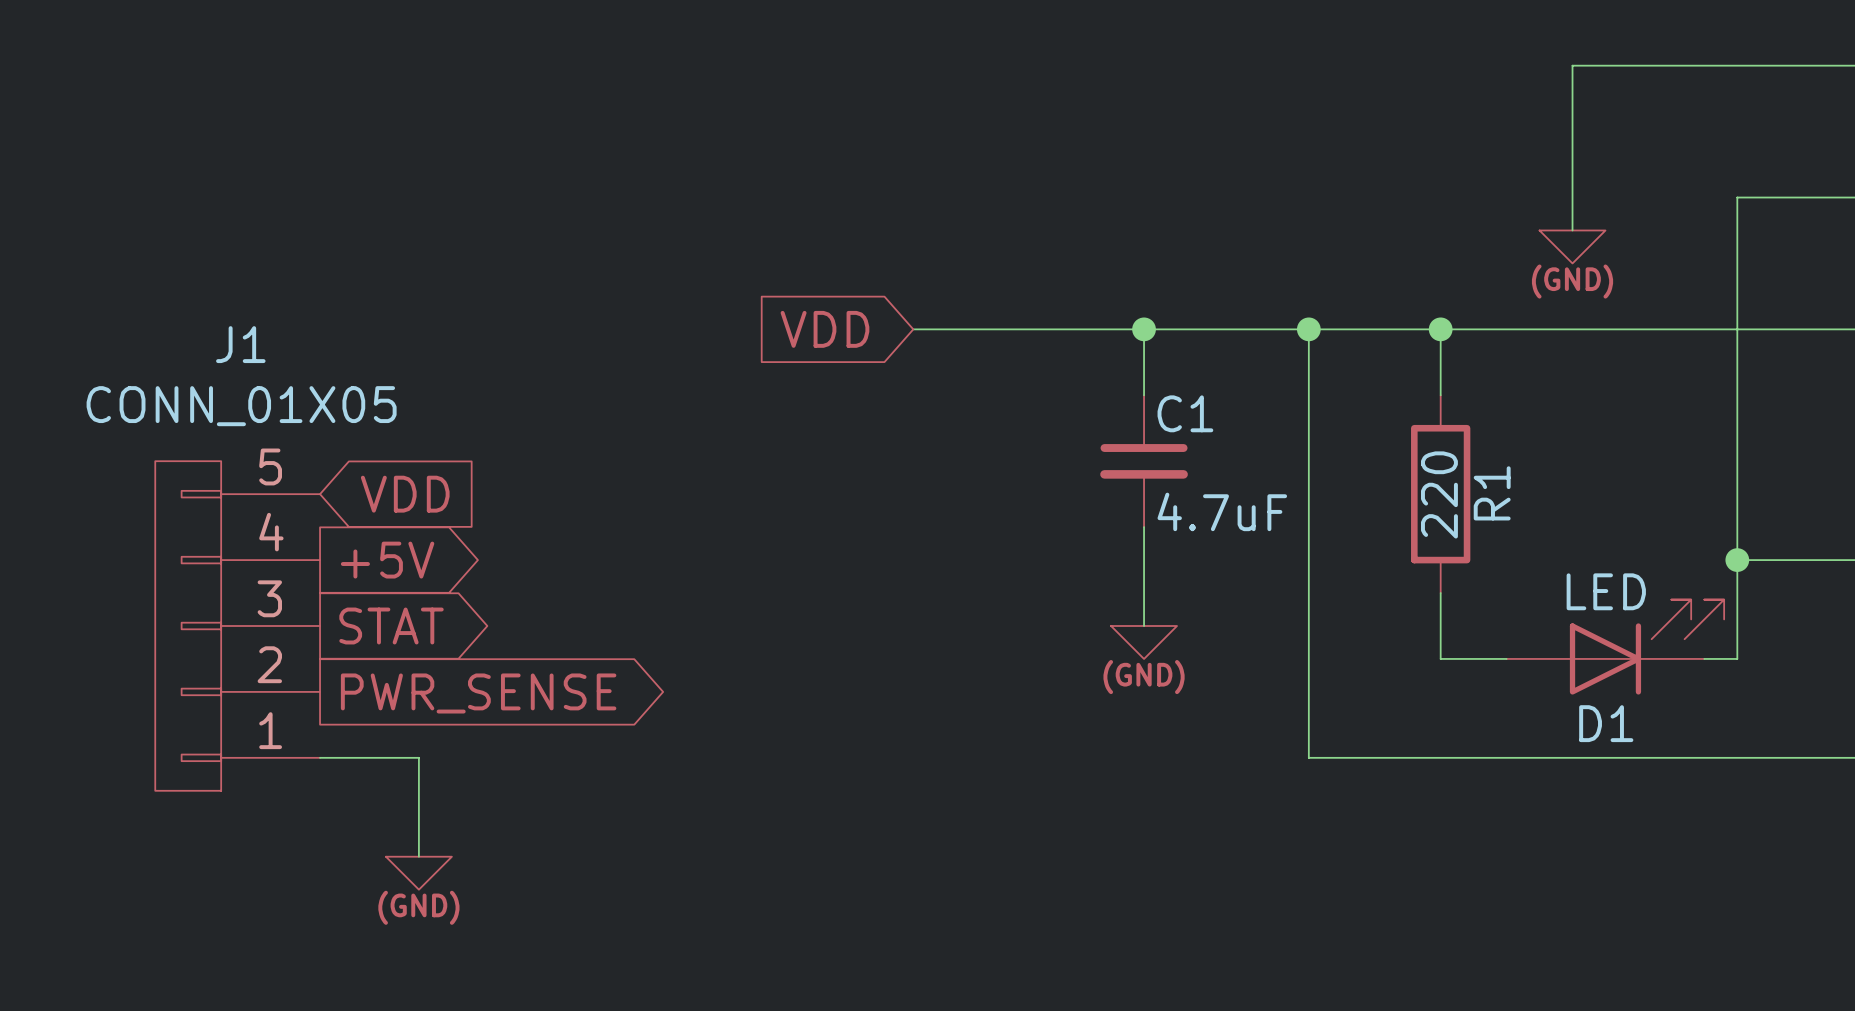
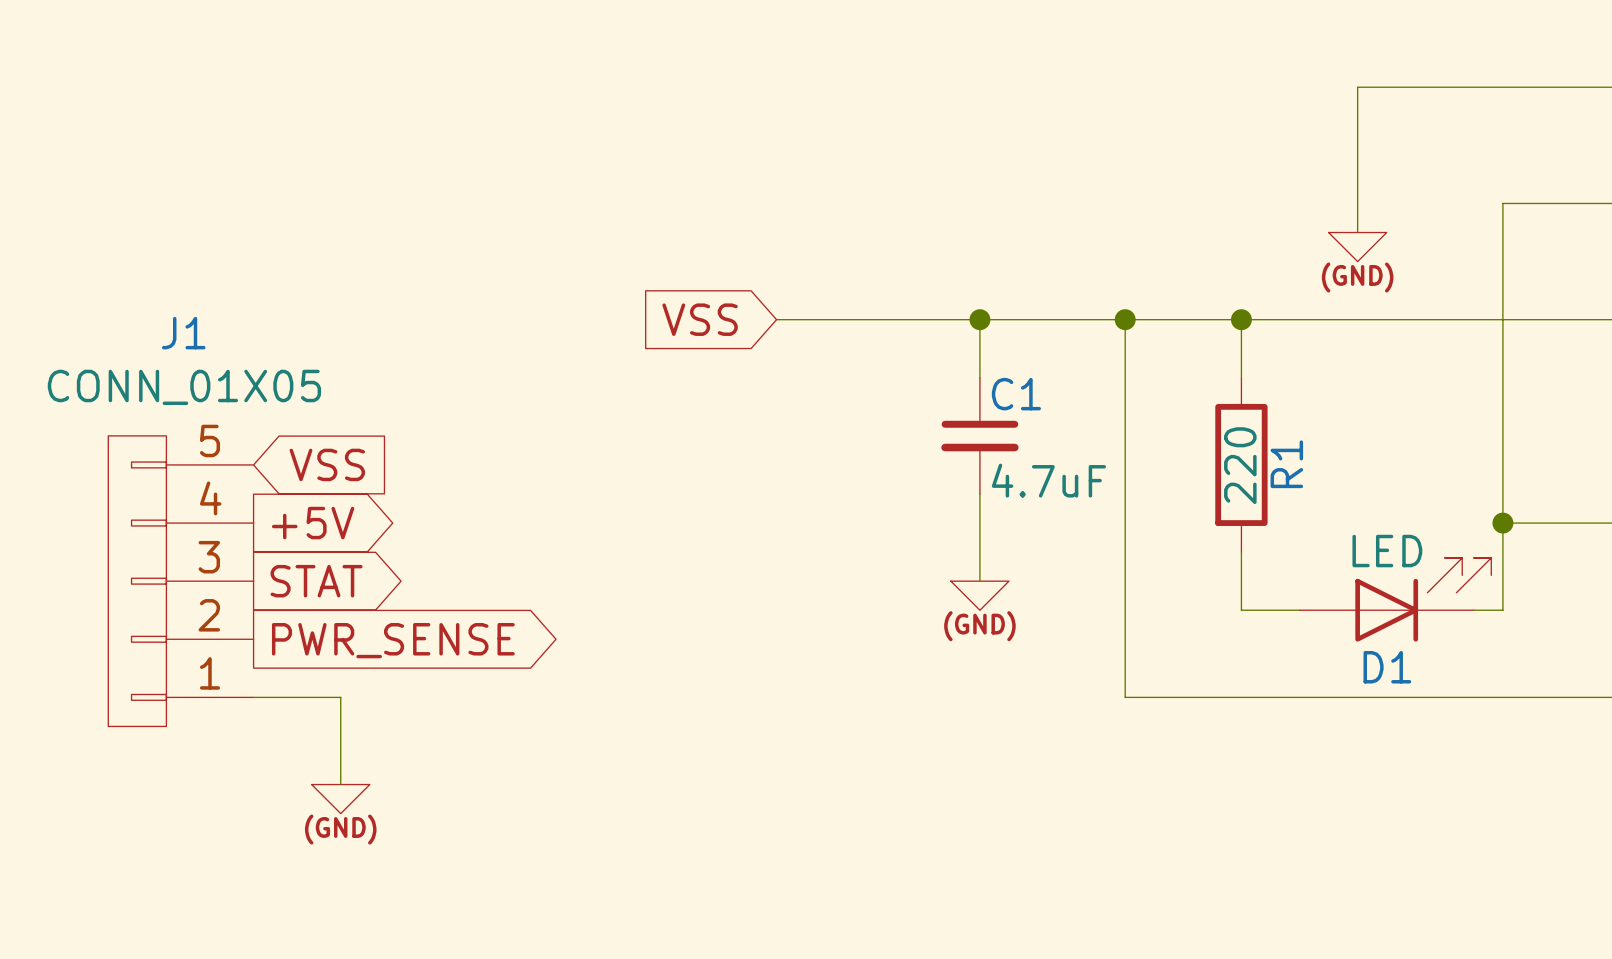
global label: VDD (824, 329) -> VSS (700, 319)
global label: VDD (405, 494) -> VSS (327, 464)

